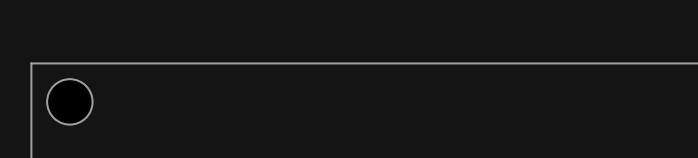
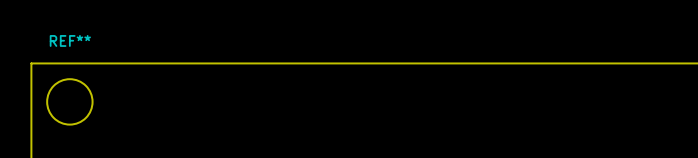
REF** name: none -> REF** (70, 40)

